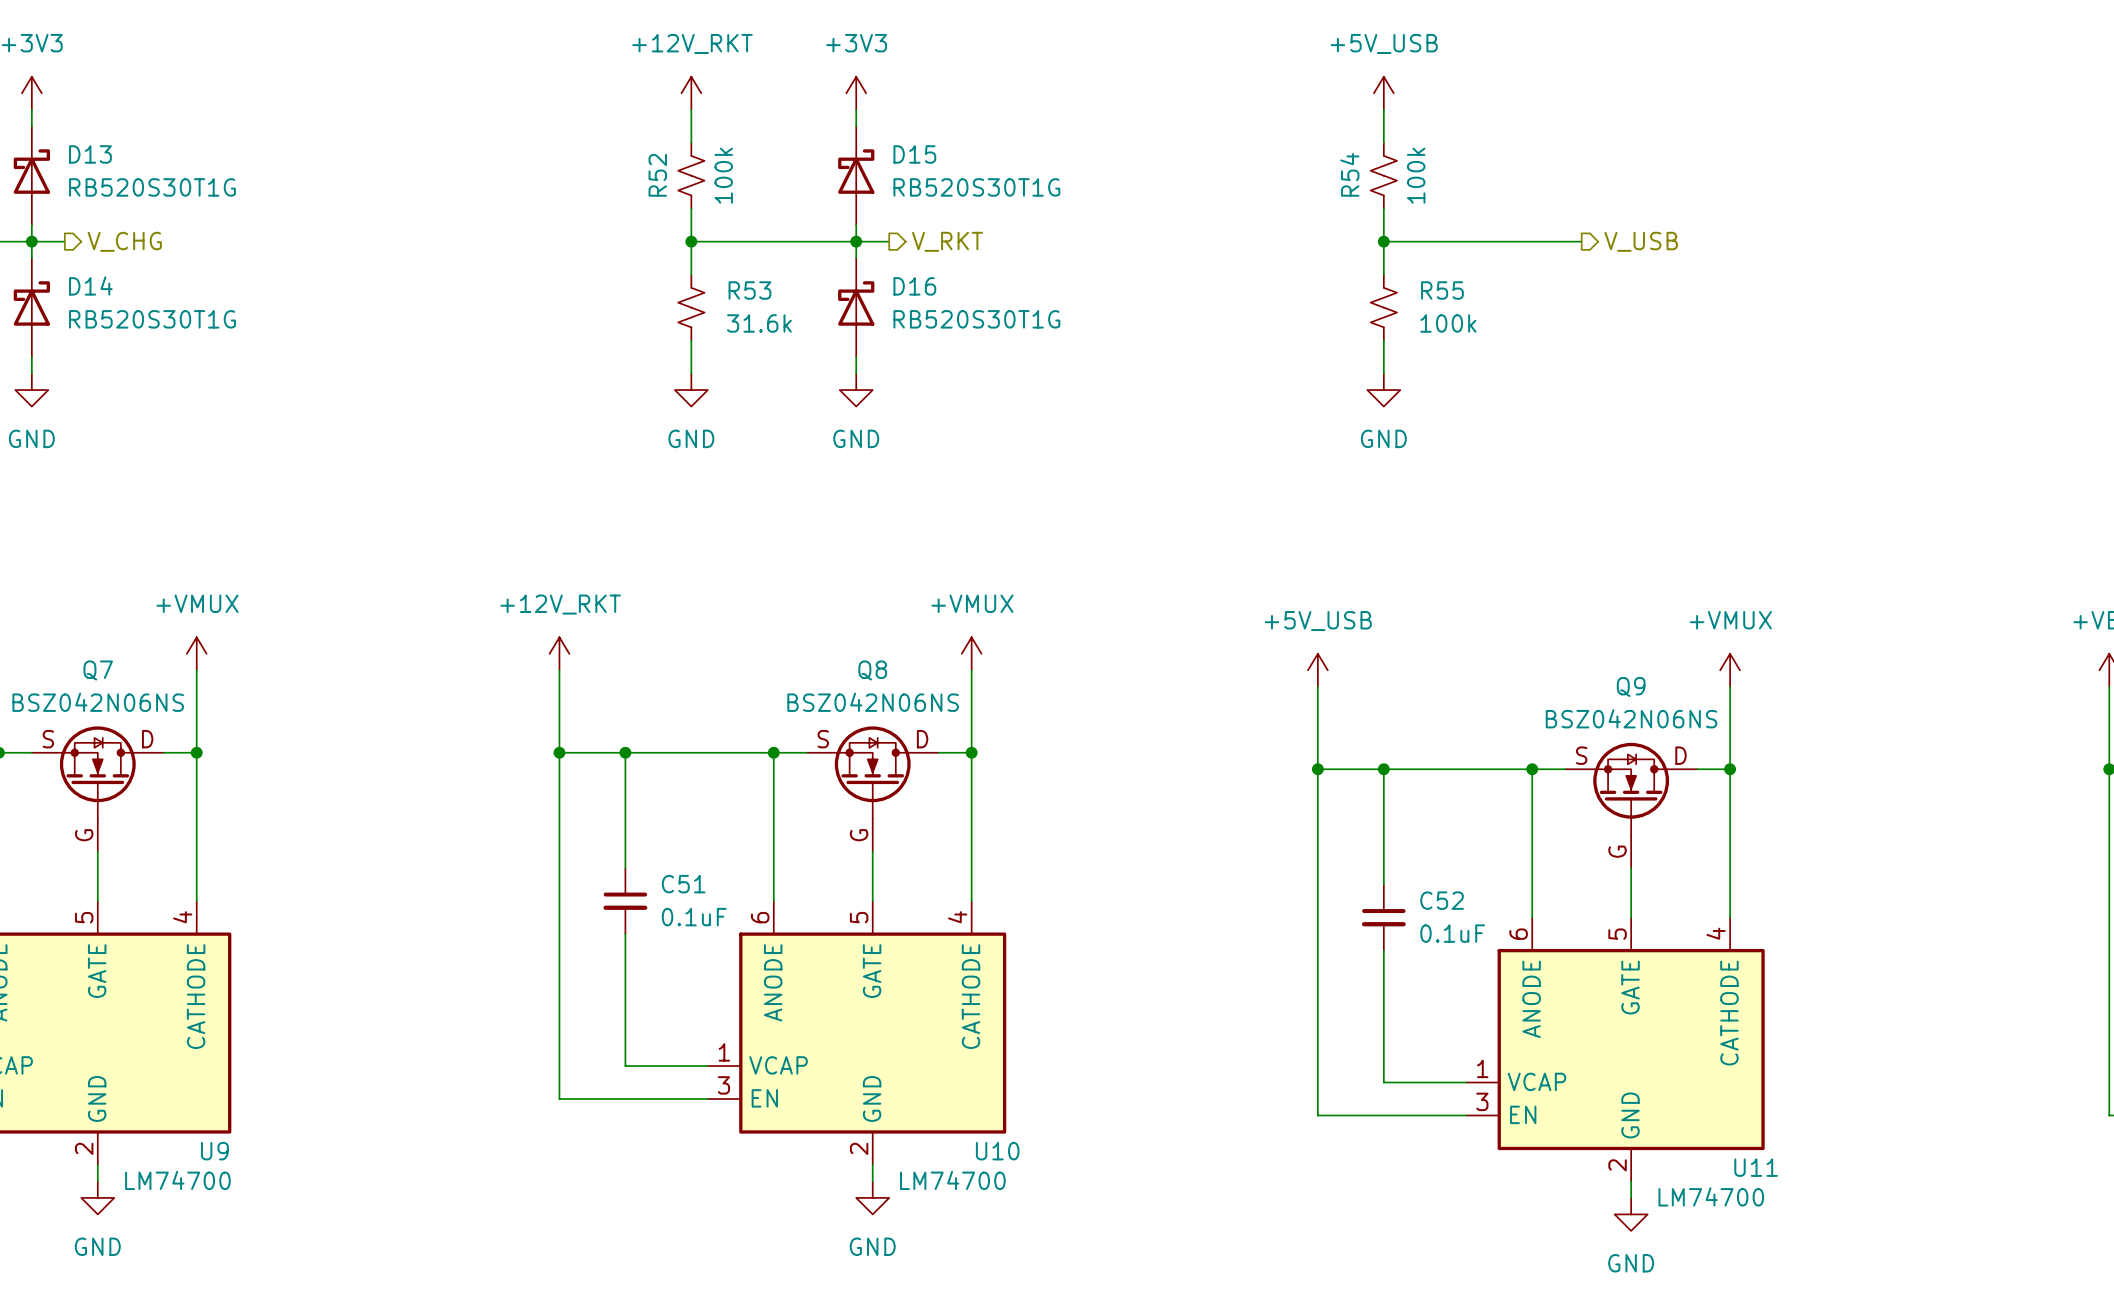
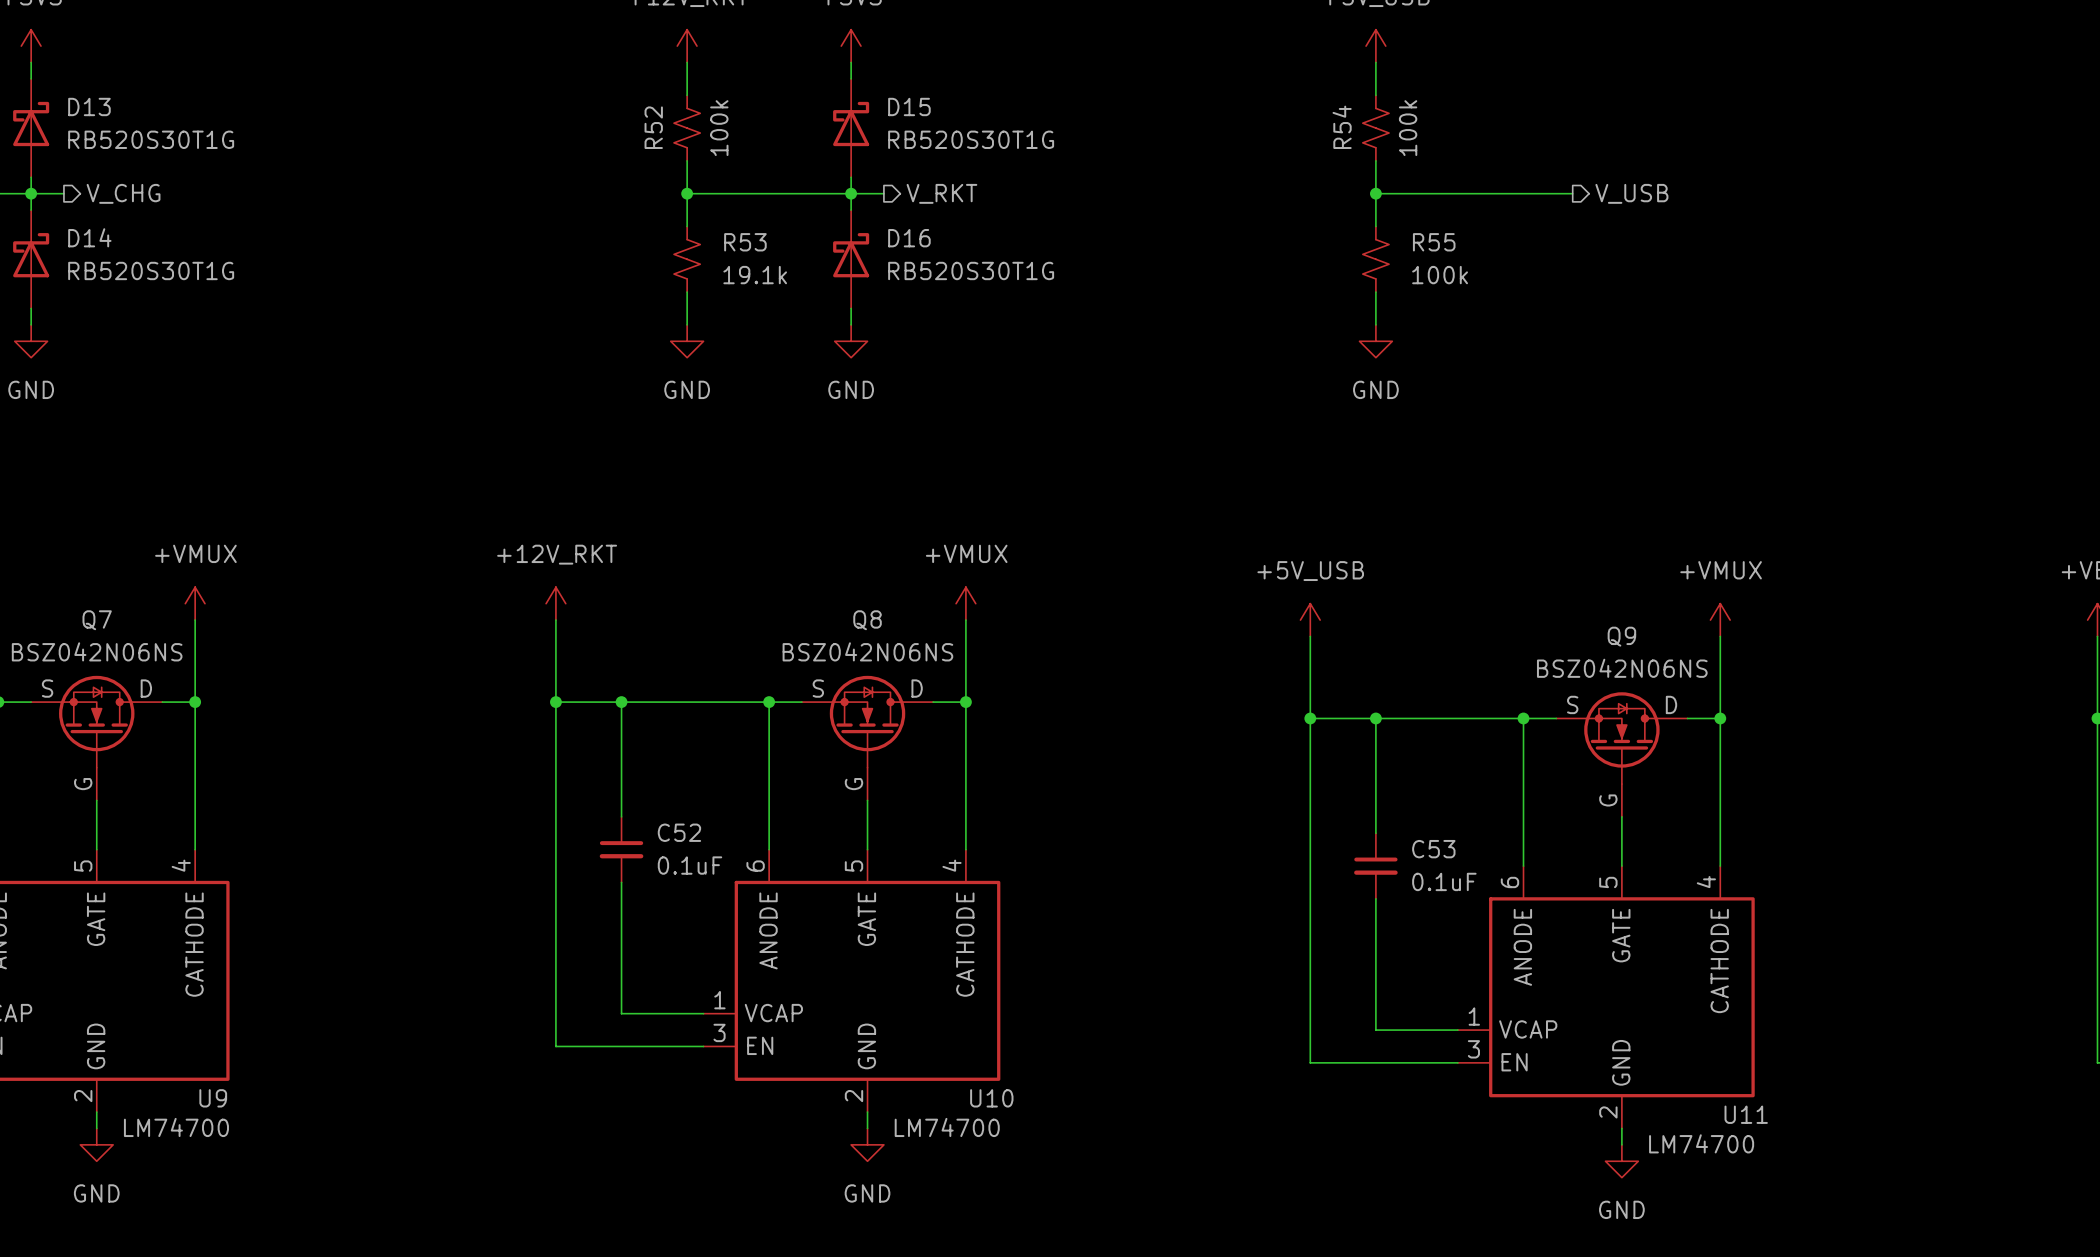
R53 value: 31.6k (759, 323) -> 19.1k (755, 275)
C51 name: C51 (683, 884) -> C52 (679, 832)
C52 name: C52 (1442, 900) -> C53 (1433, 849)

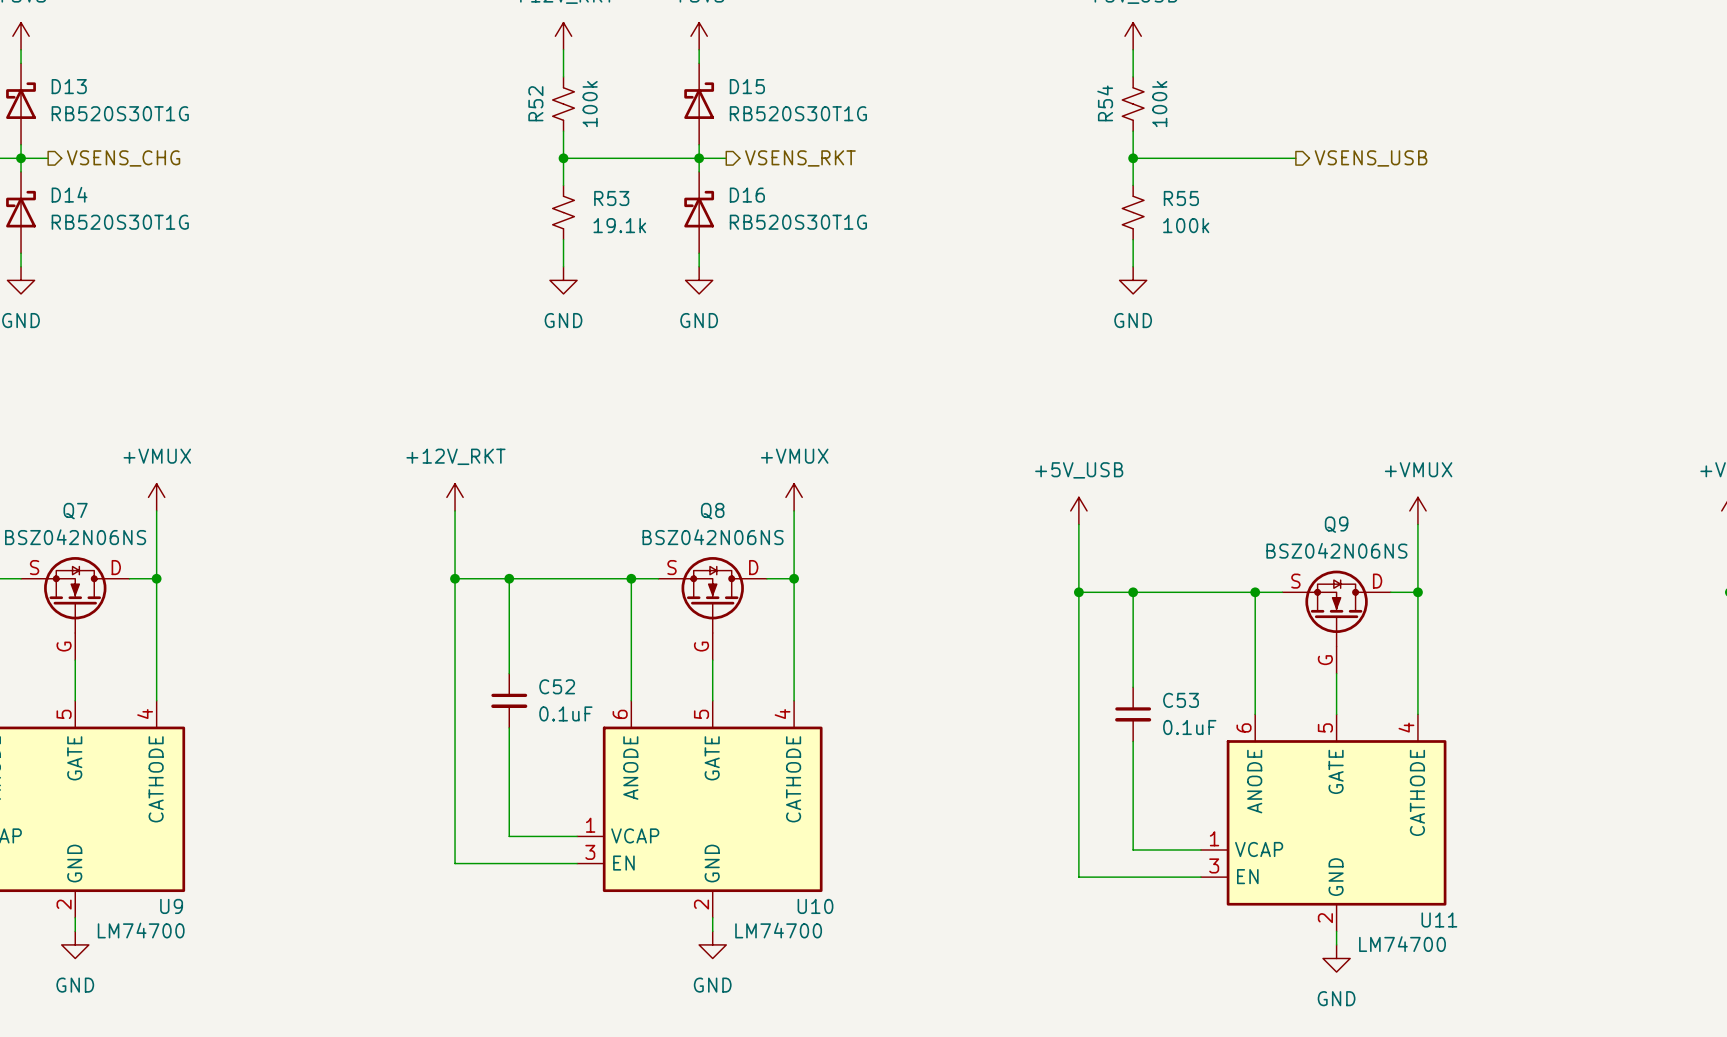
hierarchical label: V_CHG (123, 193) -> VSENS_CHG (123, 158)
hierarchical label: V_RKT (941, 193) -> VSENS_RKT (800, 158)
hierarchical label: V_USB (1631, 193) -> VSENS_USB (1371, 158)

